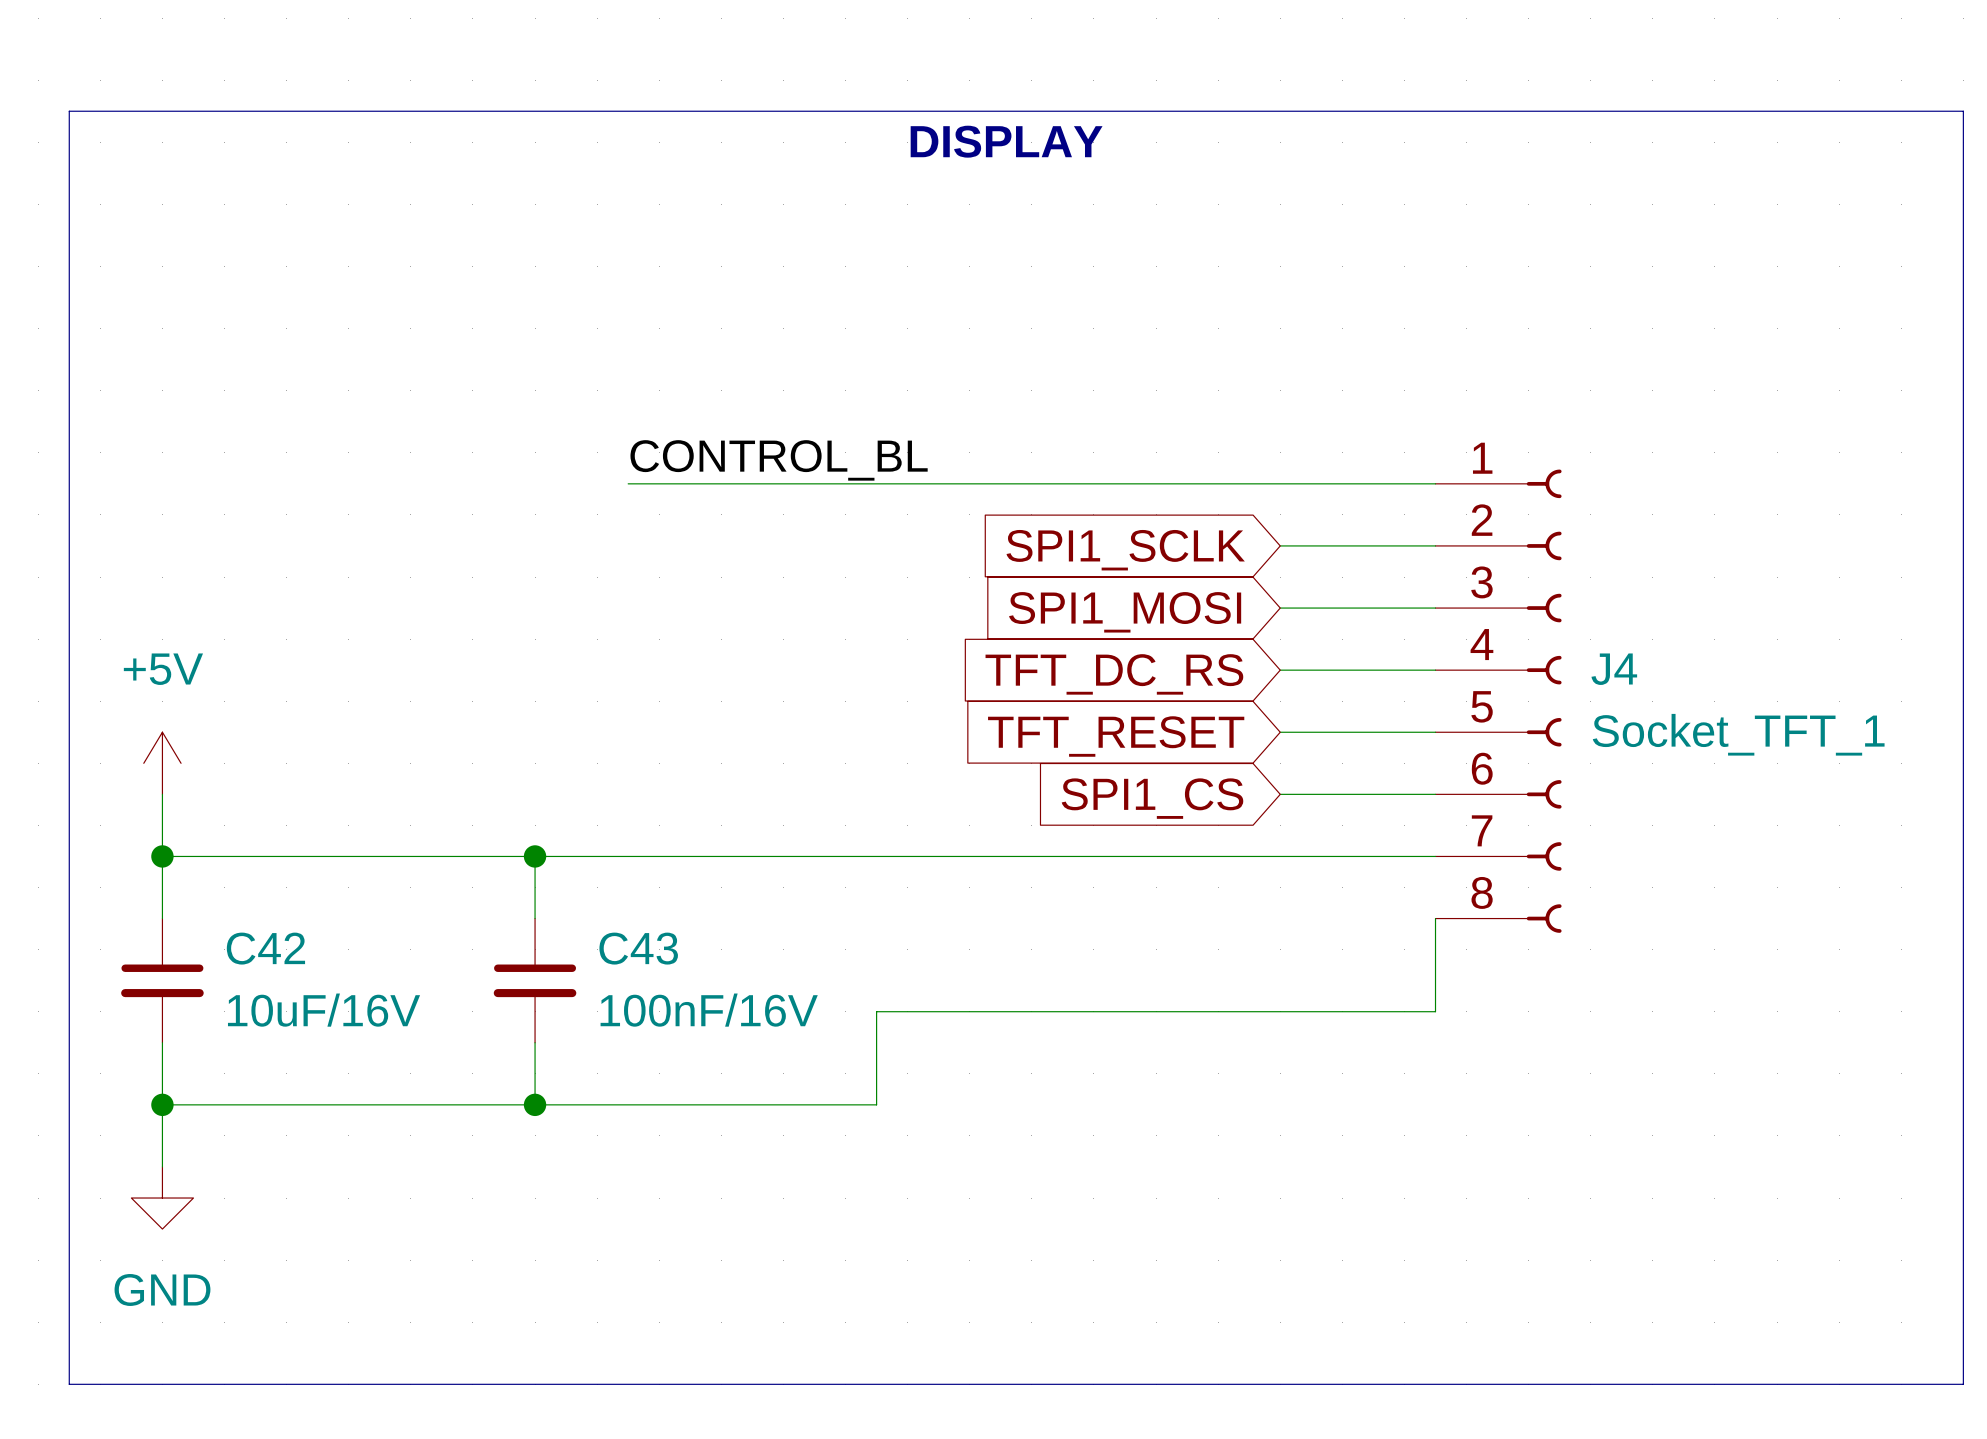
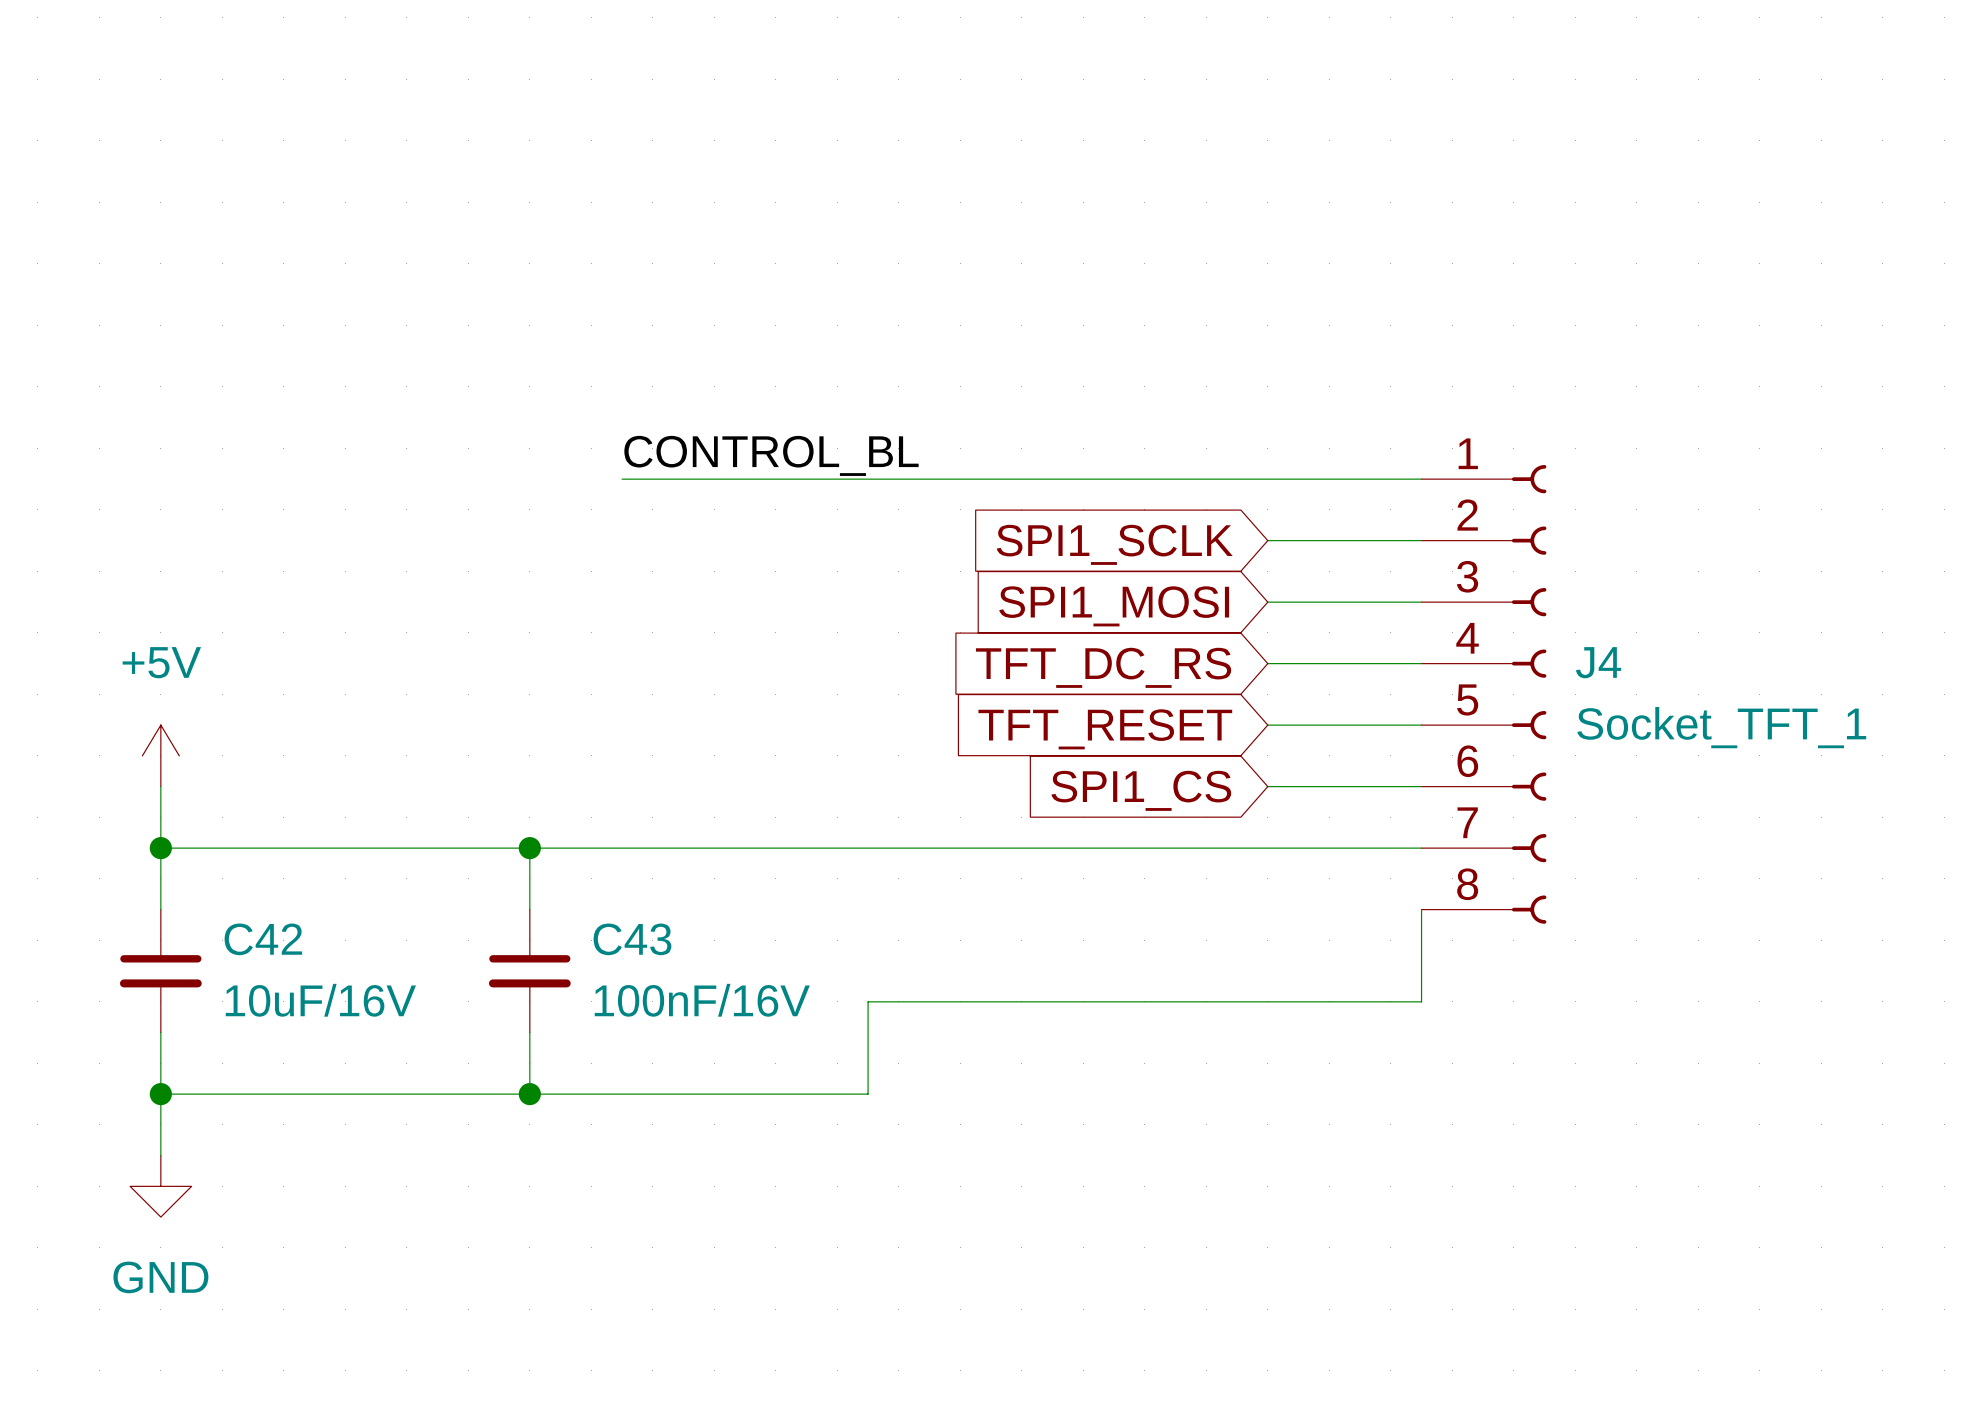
line: (69, 111) (1963, 111) (1963, 1384) (69, 1384) (69, 111) -> none
text: DISPLAY (1006, 141) -> none

